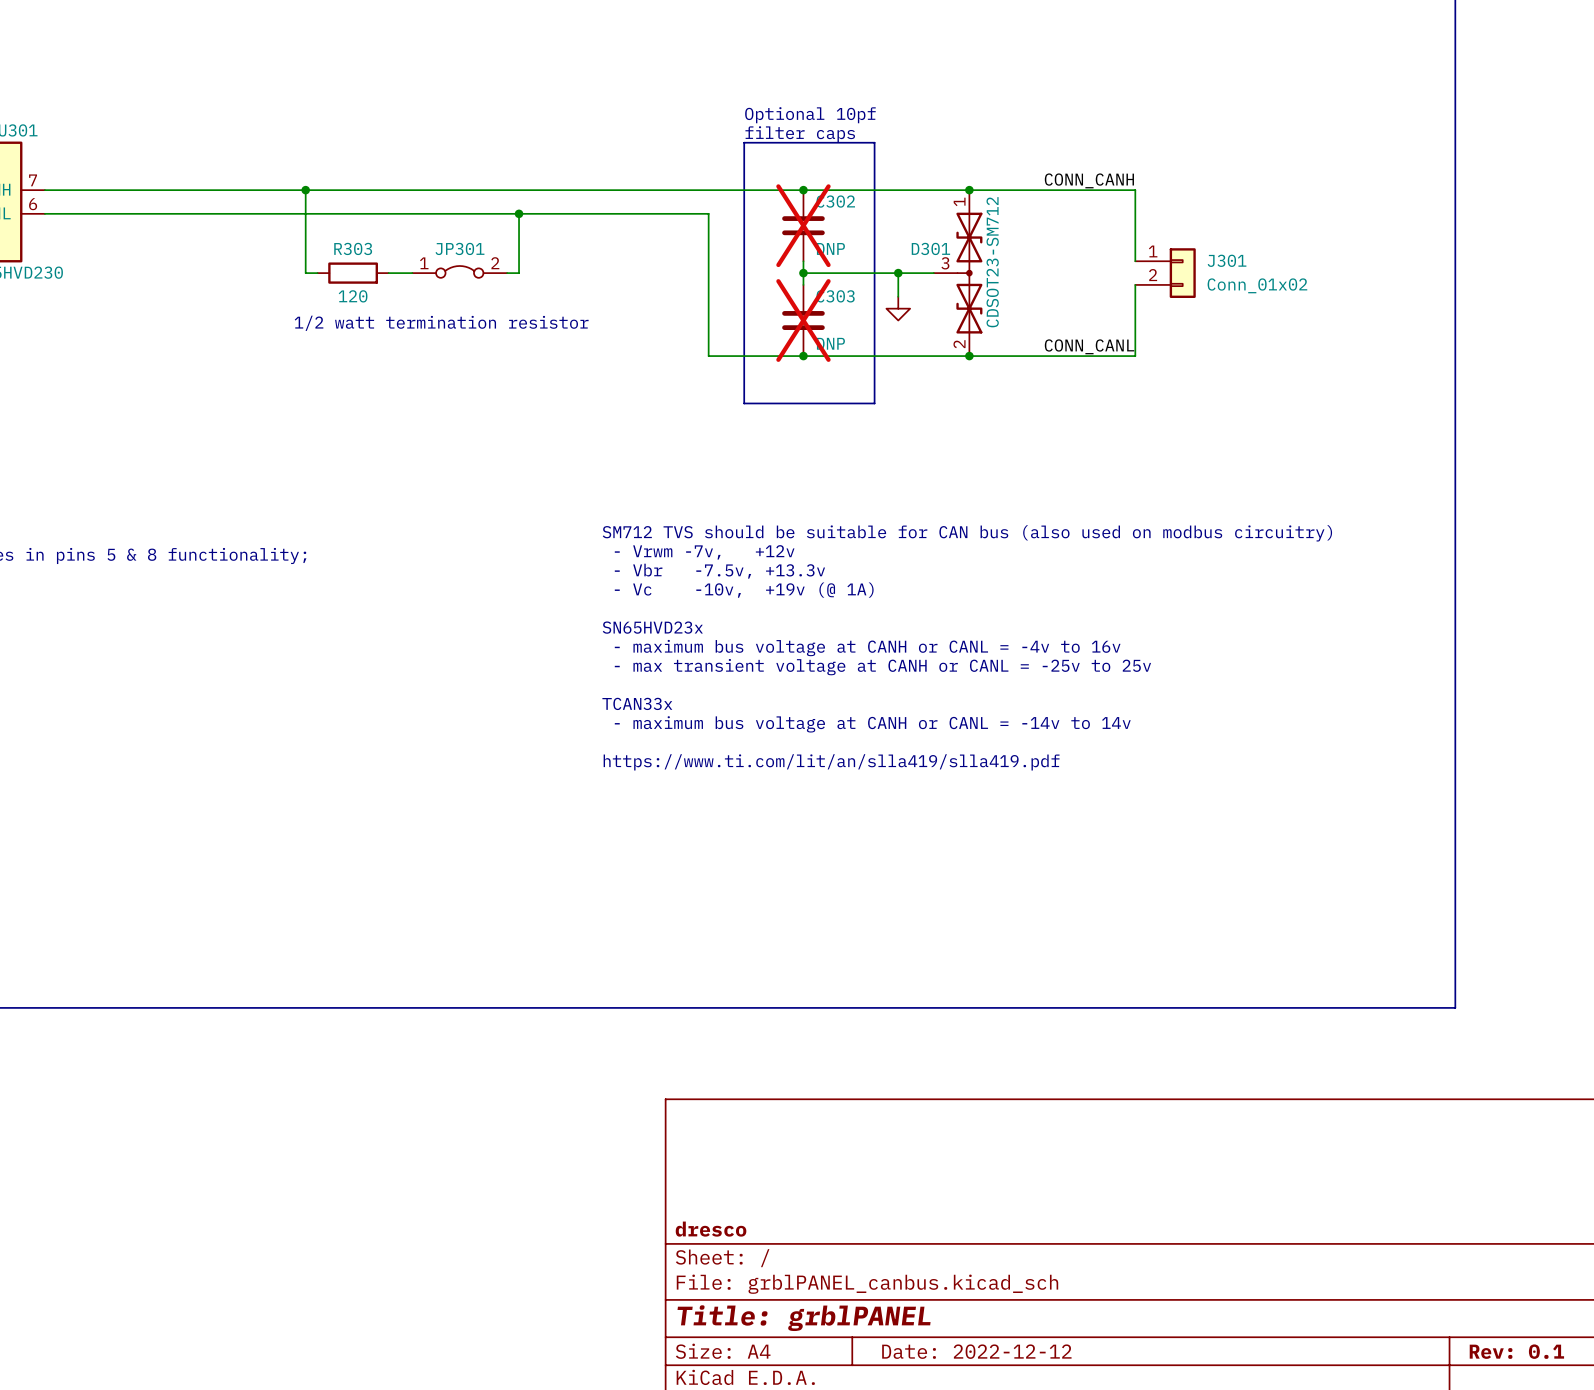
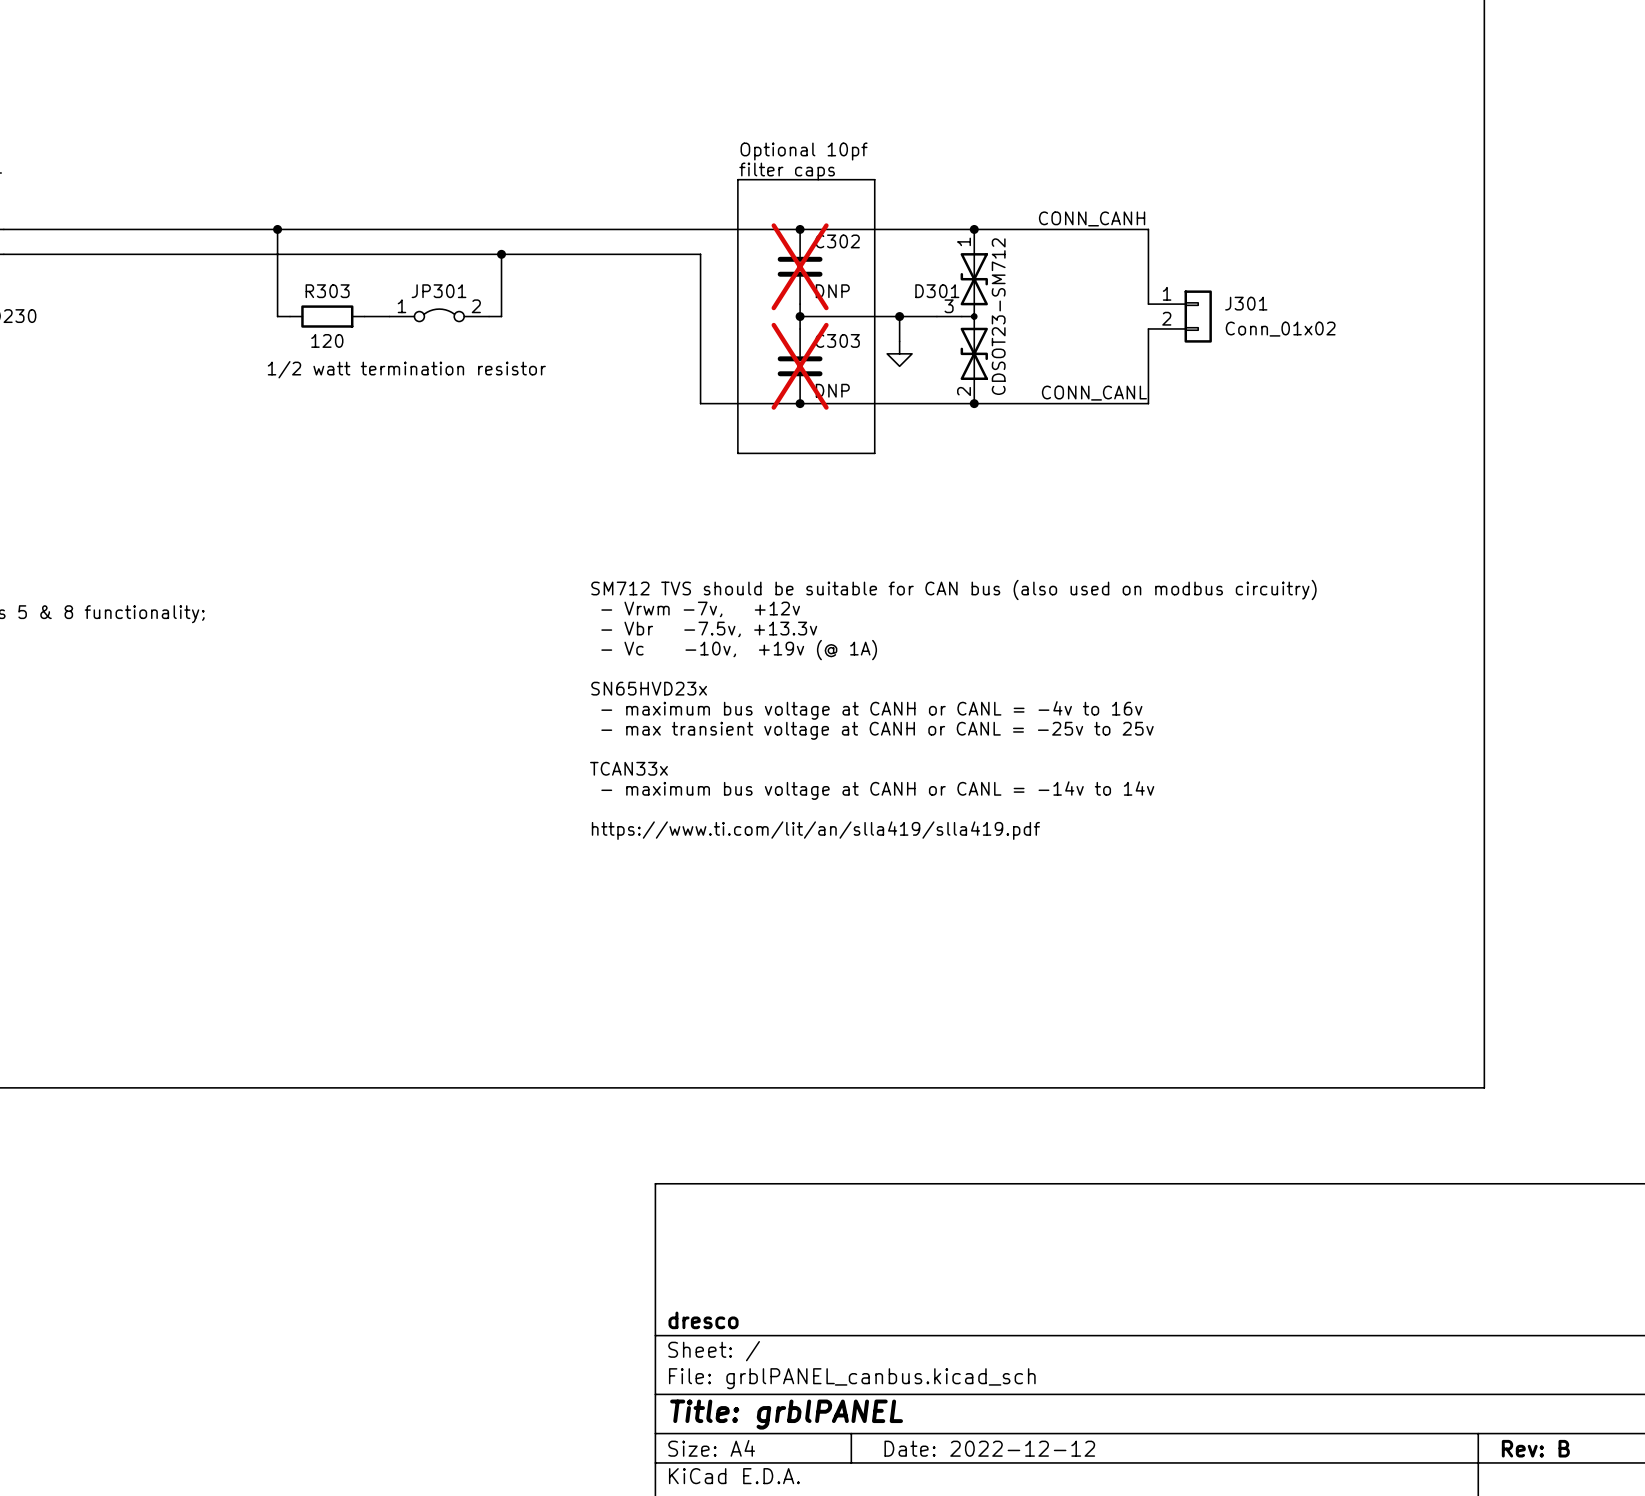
title block: Rev: 0.1 (1516, 1351) -> Rev: B (1535, 1448)

